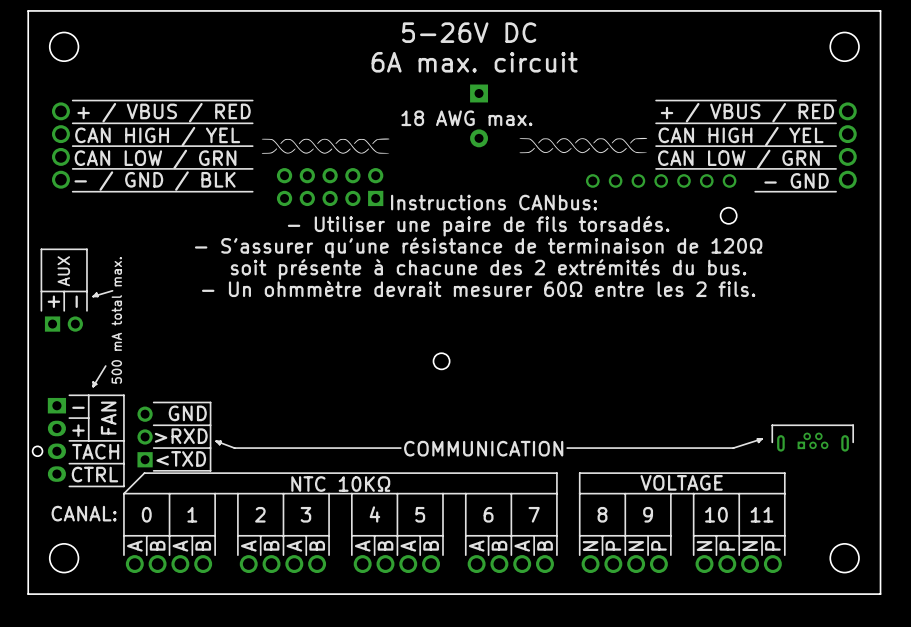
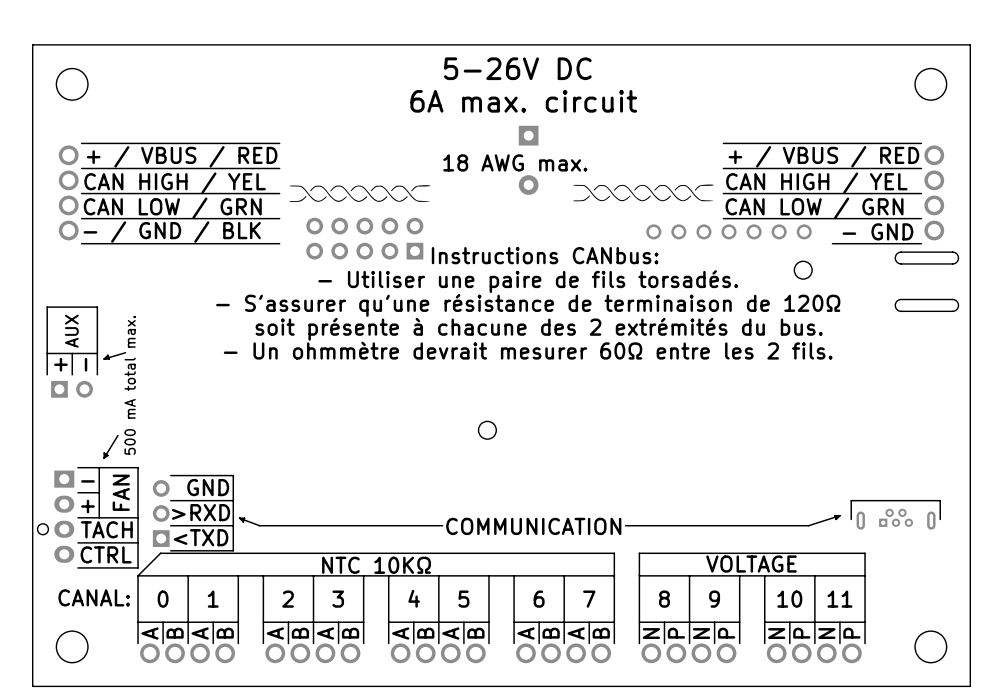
board edge: none -> (952, 252) (900, 252) (896, 254) (895, 258) (900, 263) (953, 263) (957, 261) (958, 257) (952, 252)
board edge: none -> (952, 299) (900, 299) (896, 301) (895, 306) (900, 311) (953, 311) (957, 308) (958, 304) (952, 299)

